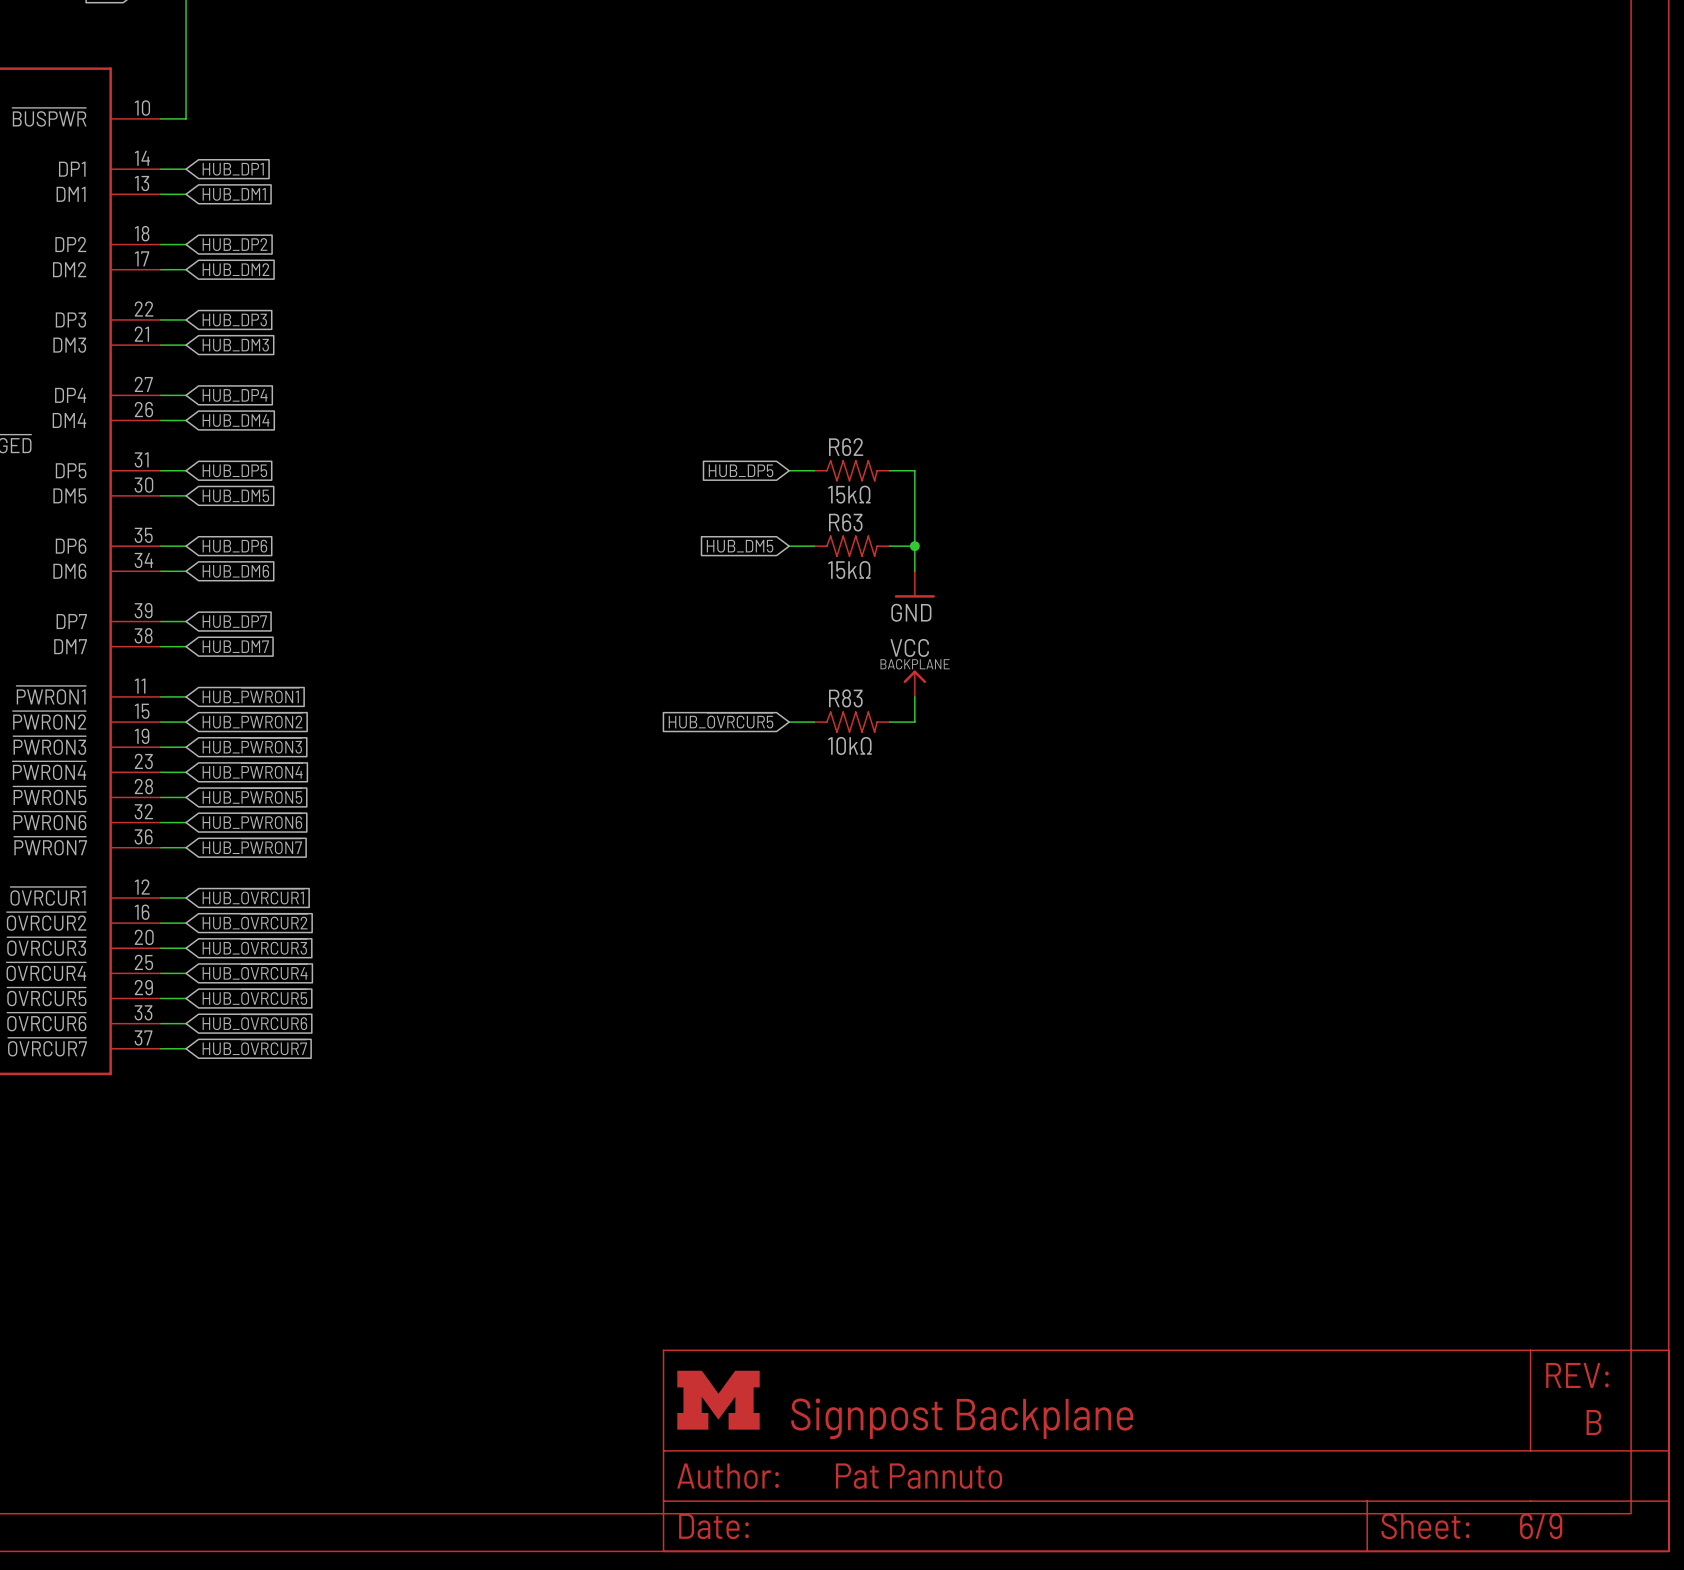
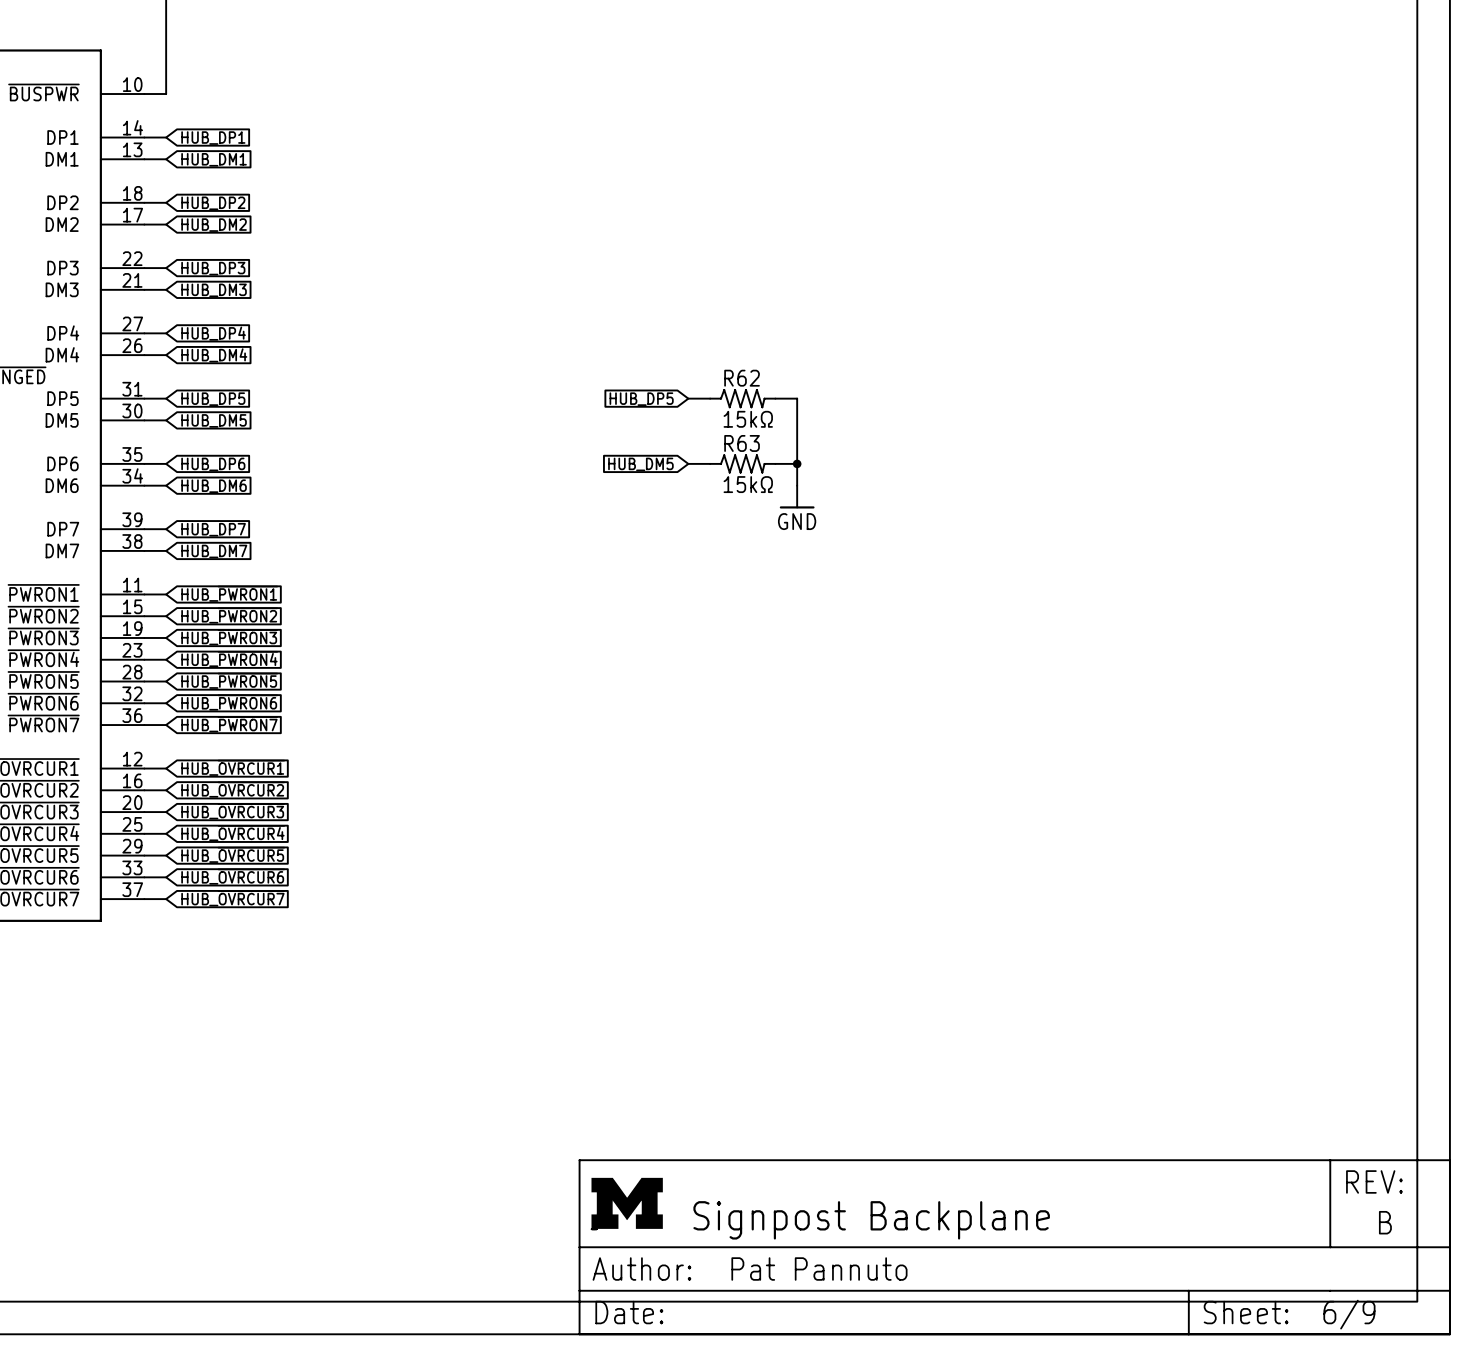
power symbol: (914, 683) -> none
wire: (914, 696) (914, 722) (889, 722) -> none
global label: HUB_~{OVRCUR5} (721, 720) -> none
wire: (789, 722) (814, 722) -> none
R83: 10kΩ (852, 722) -> none

